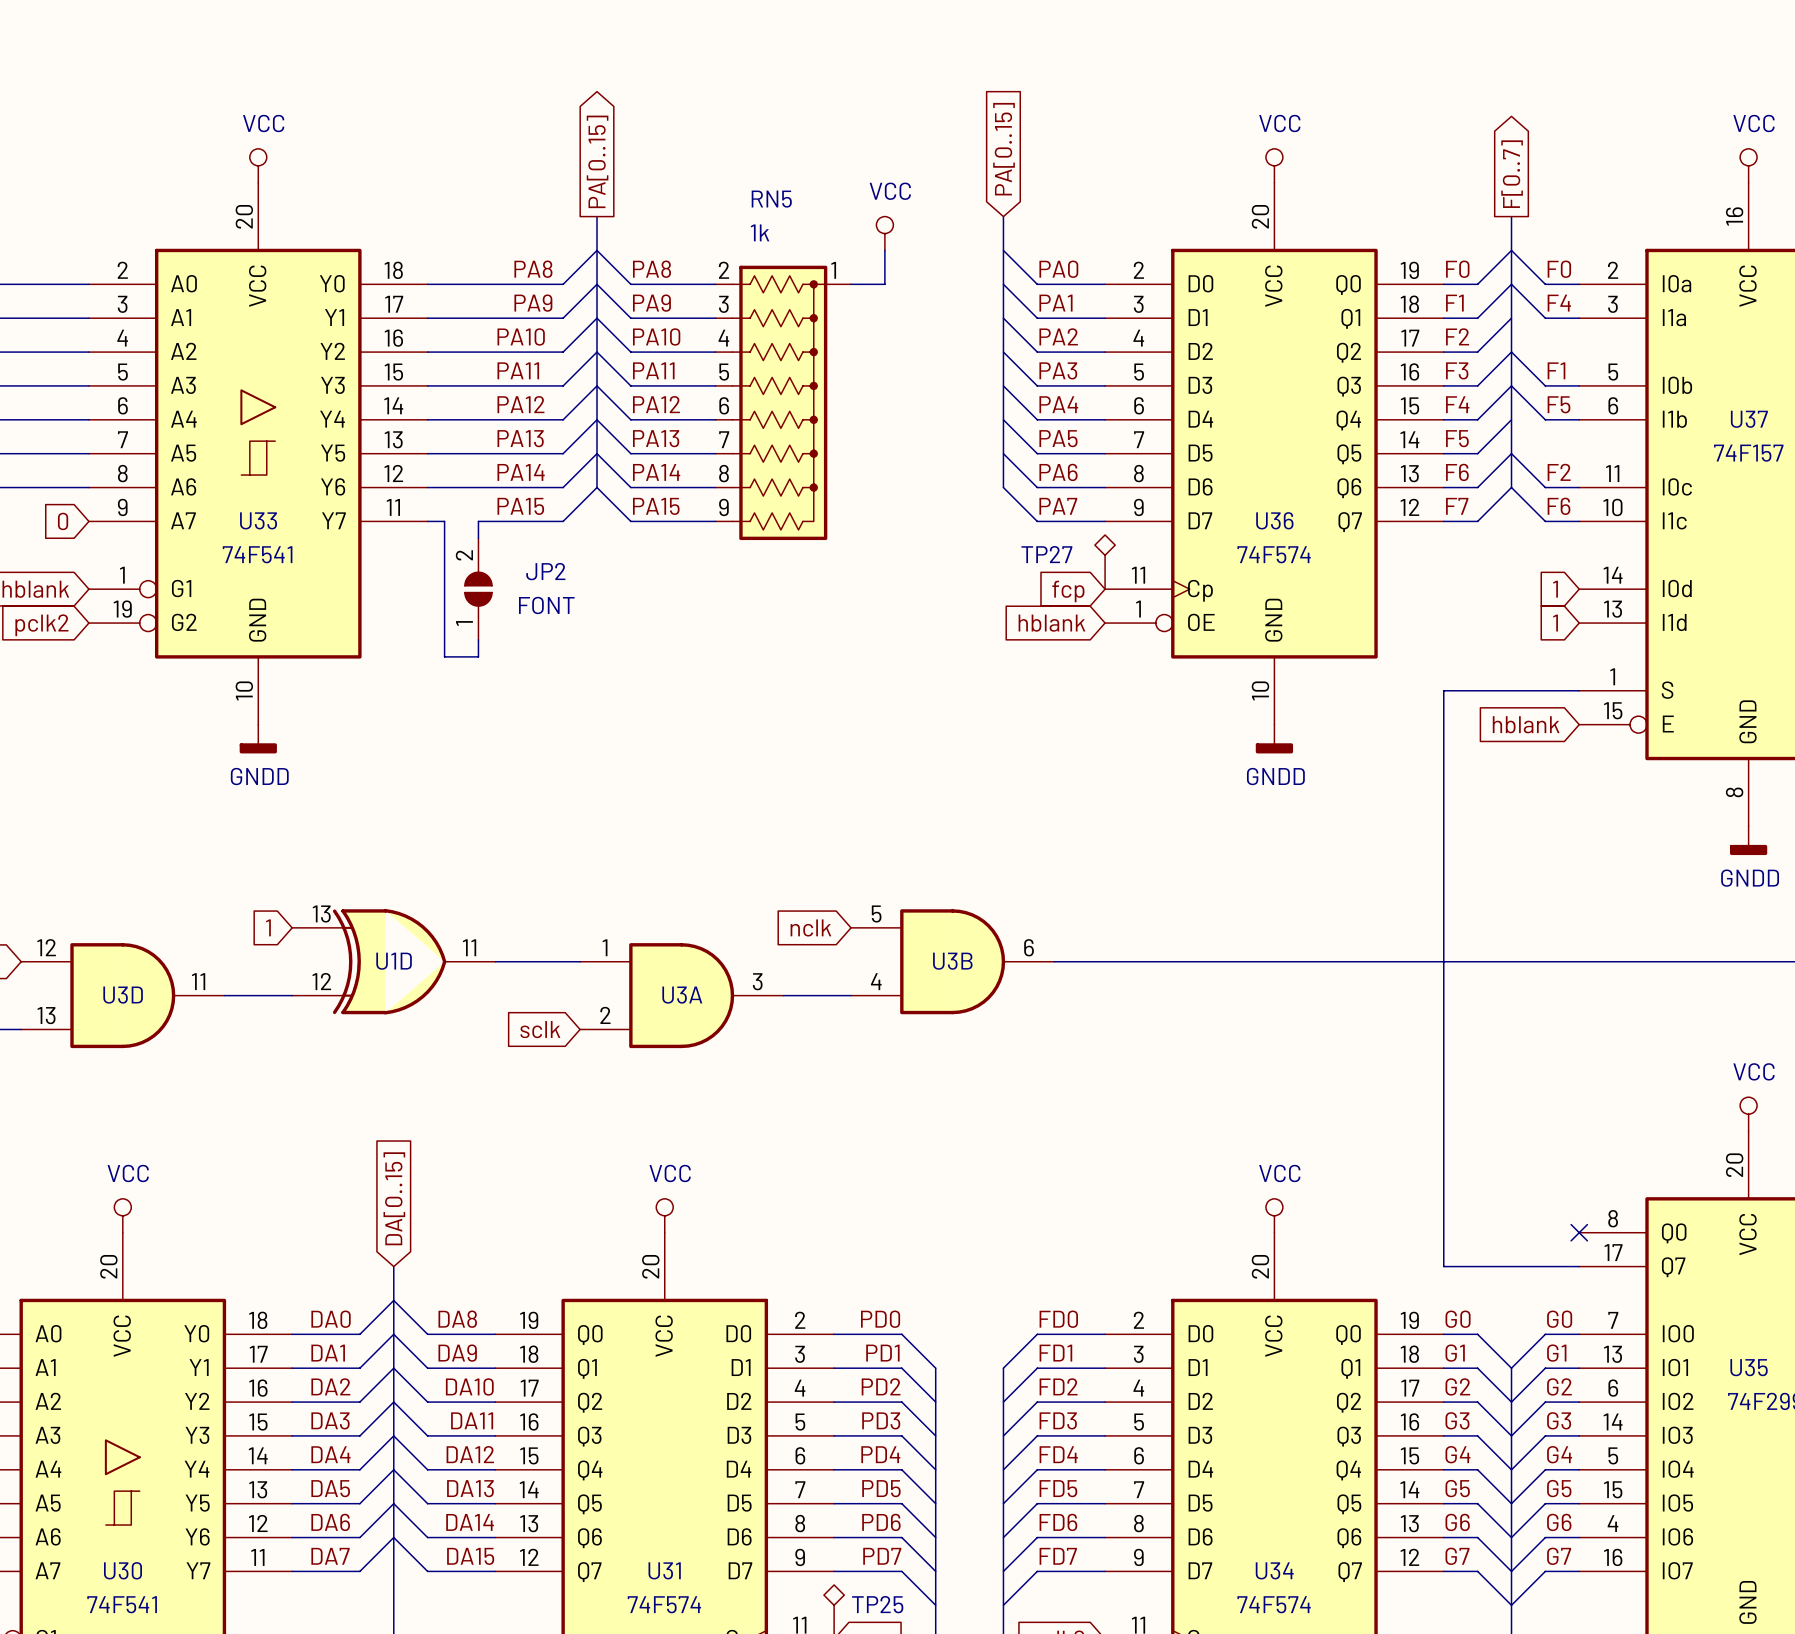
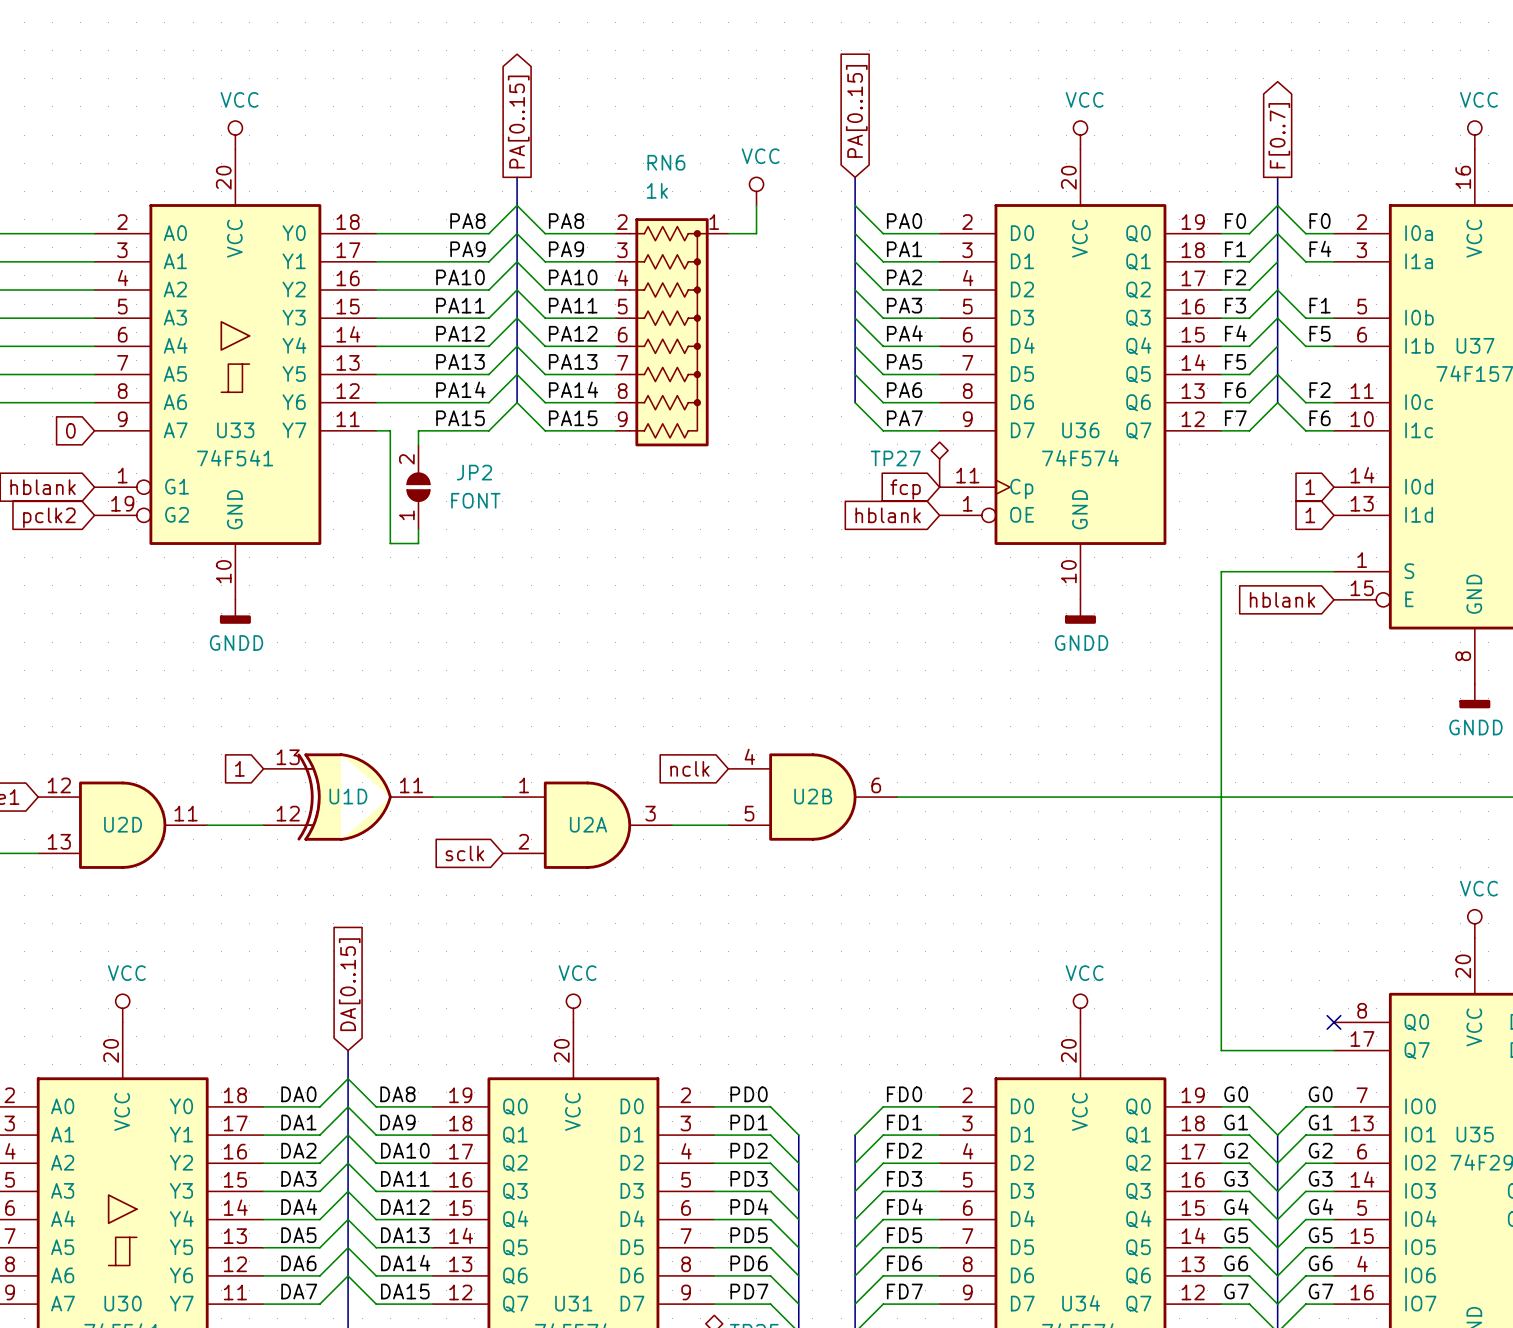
RN5 name: RN5 (771, 199) -> RN6 (666, 162)
U3B flip: as is (952, 961) -> up-down (812, 797)
U3B name: U3B (952, 961) -> U2B (813, 796)
U3D name: U3D (123, 995) -> U2D (123, 824)
U3A name: U3A (682, 995) -> U2A (588, 824)

